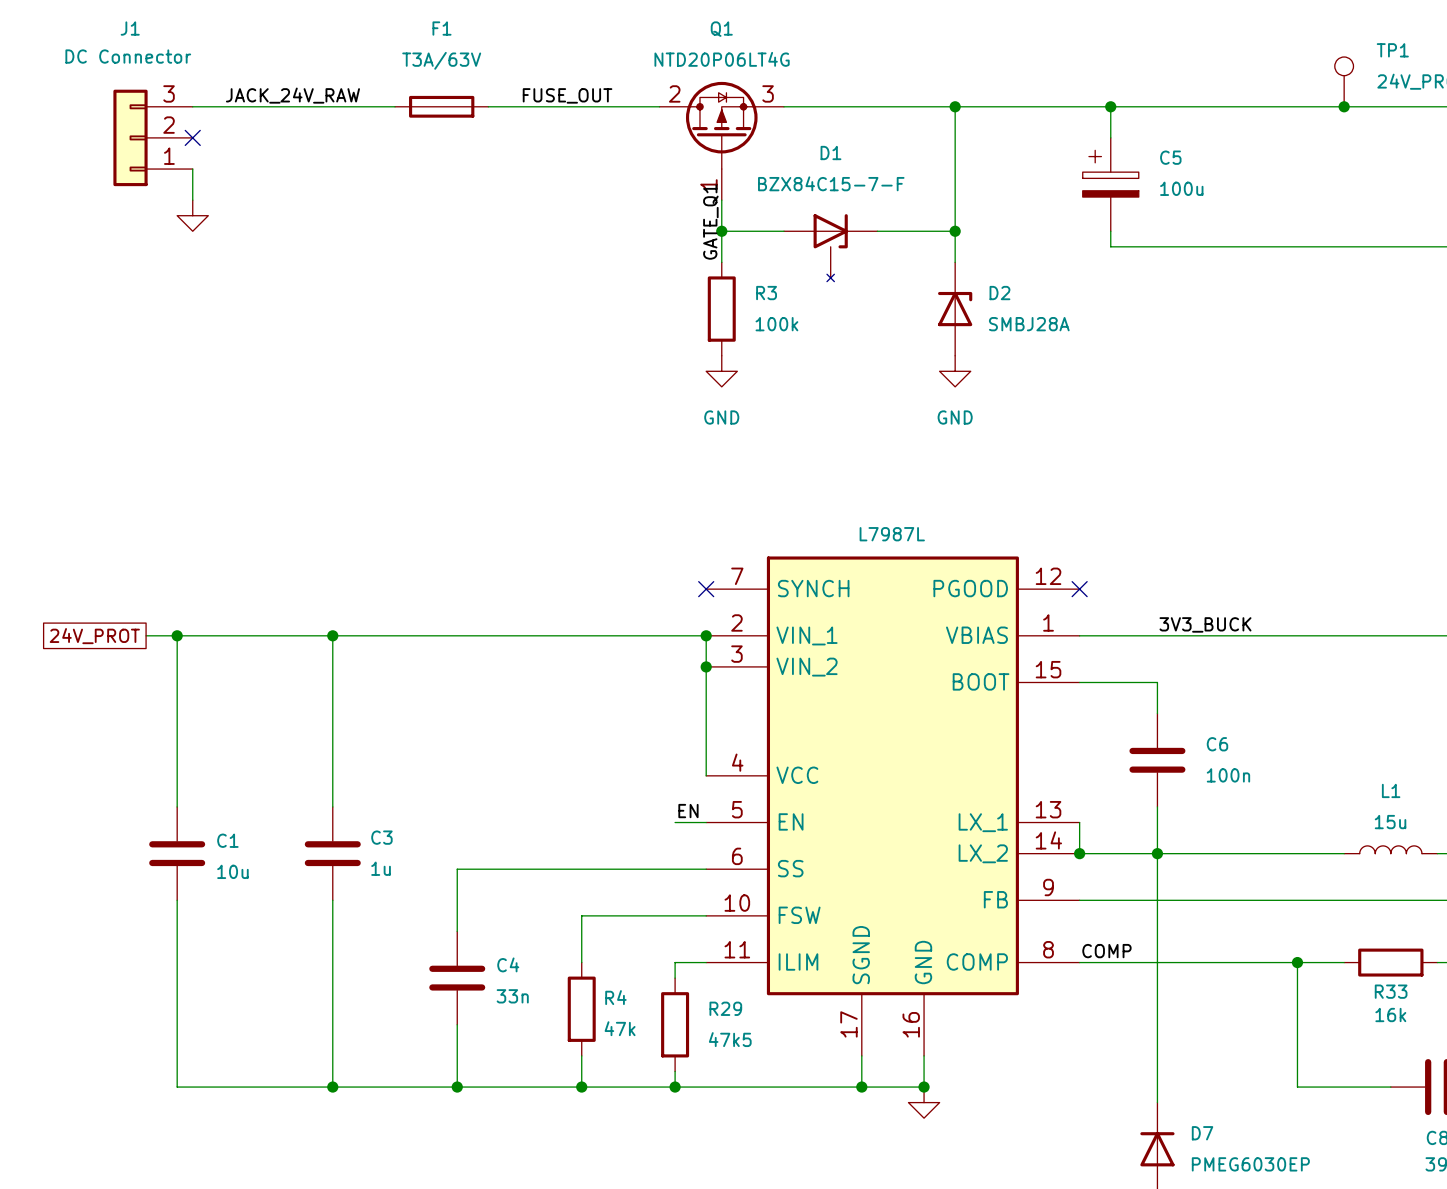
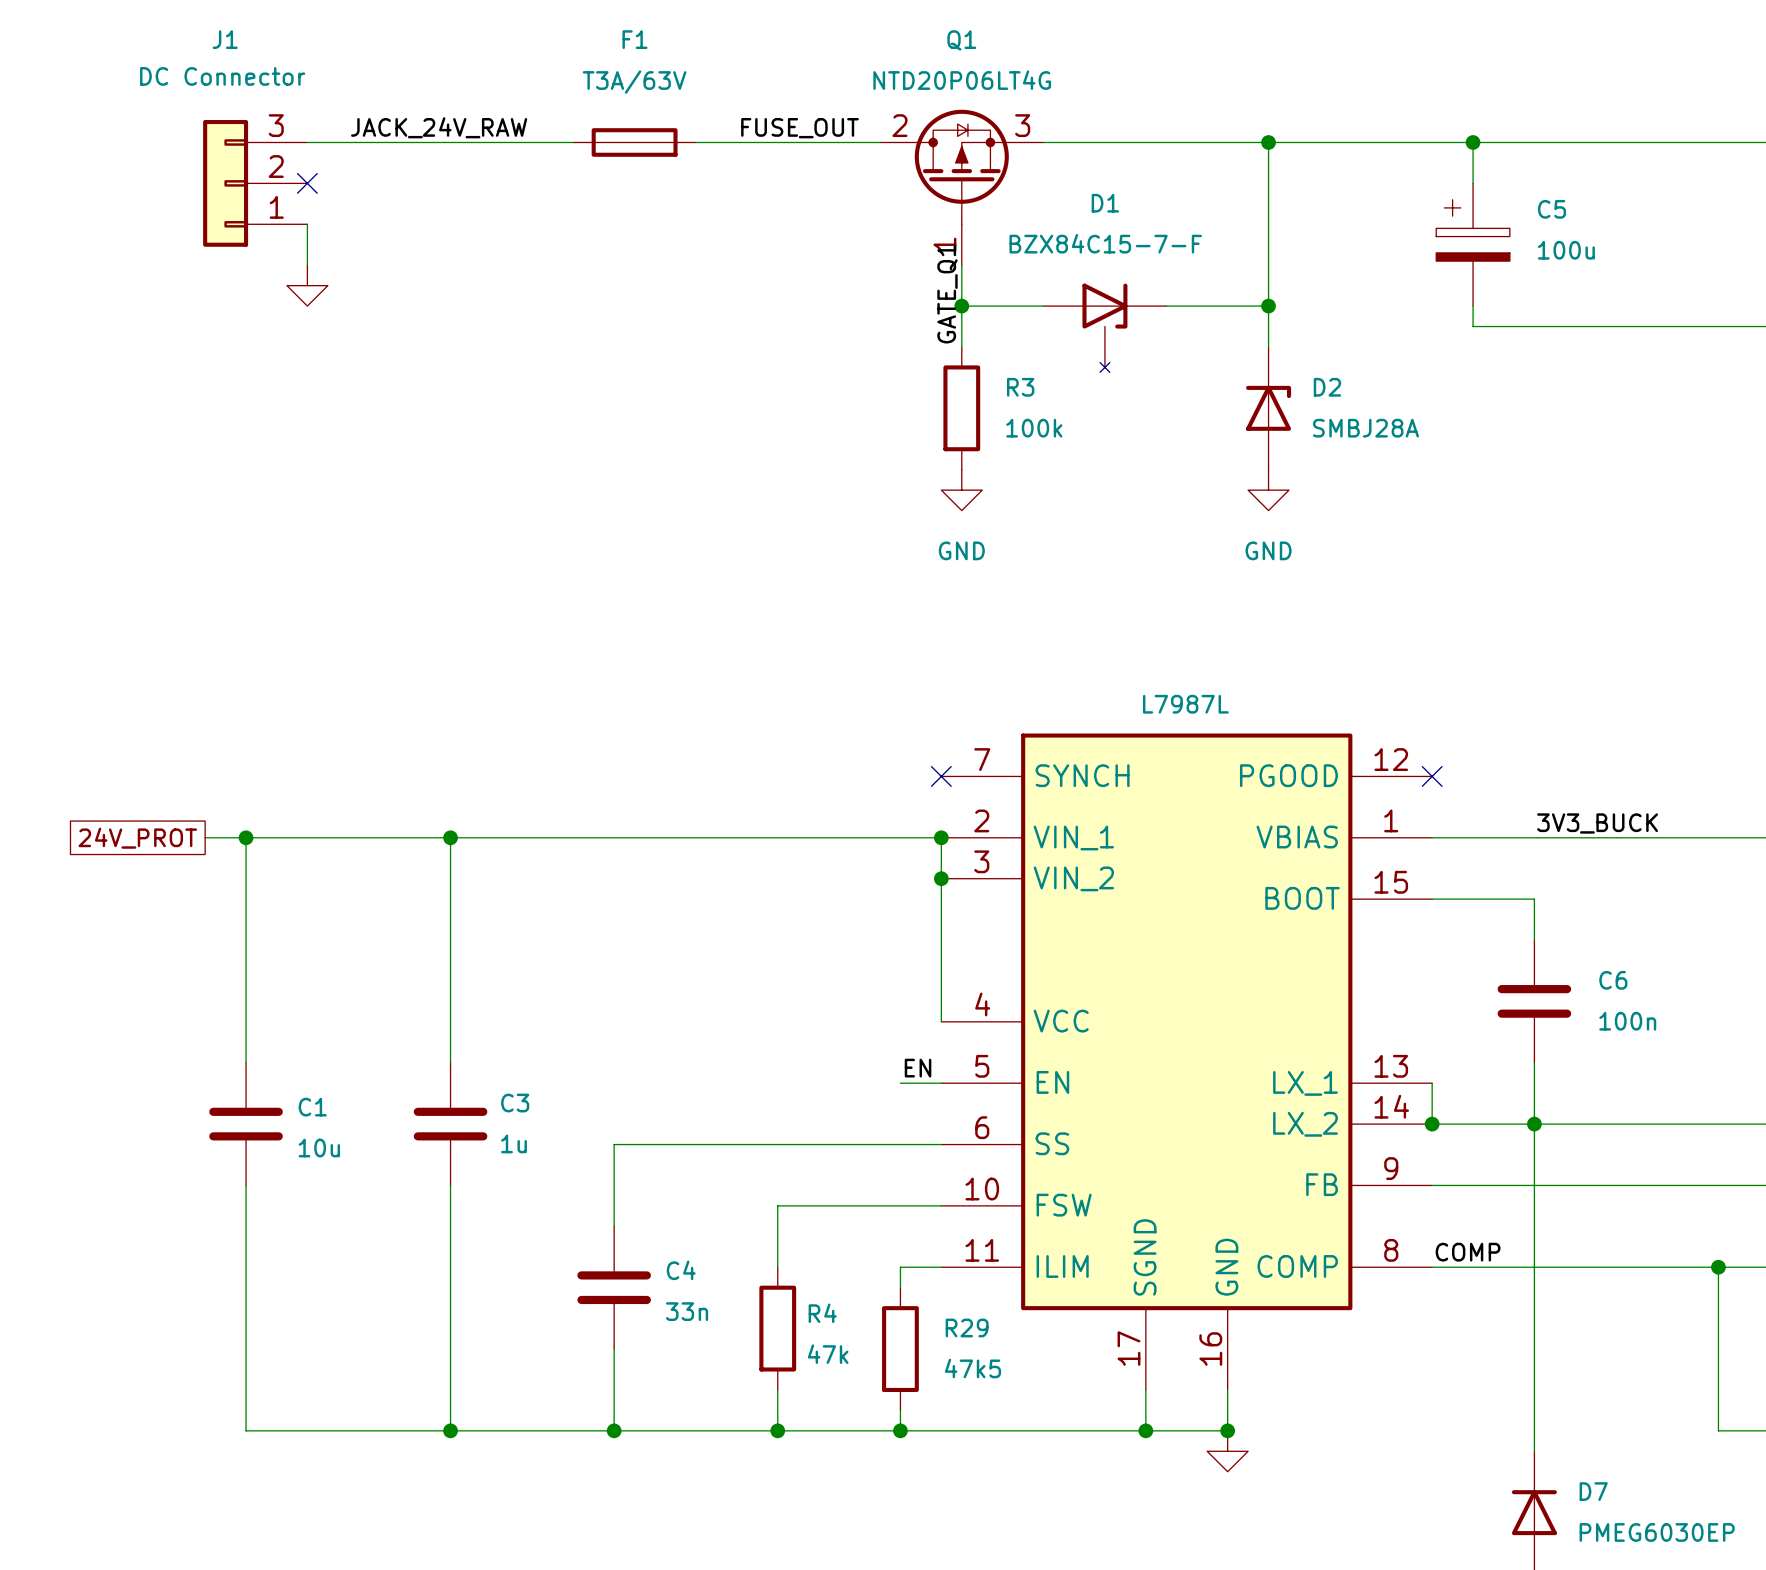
label position: JACK_24V_RAW (292, 95) -> JACK_24V_RAW (439, 127)
label position: FUSE_OUT (567, 95) -> FUSE_OUT (800, 128)
F1 position: (441, 106) -> (634, 142)
J1 position: (153, 137) -> (255, 183)
no-connect mark position: (192, 137) -> (307, 183)
wire: (192, 169) (192, 200) -> (307, 224) (307, 265)
power symbol position: (192, 215) -> (307, 285)

